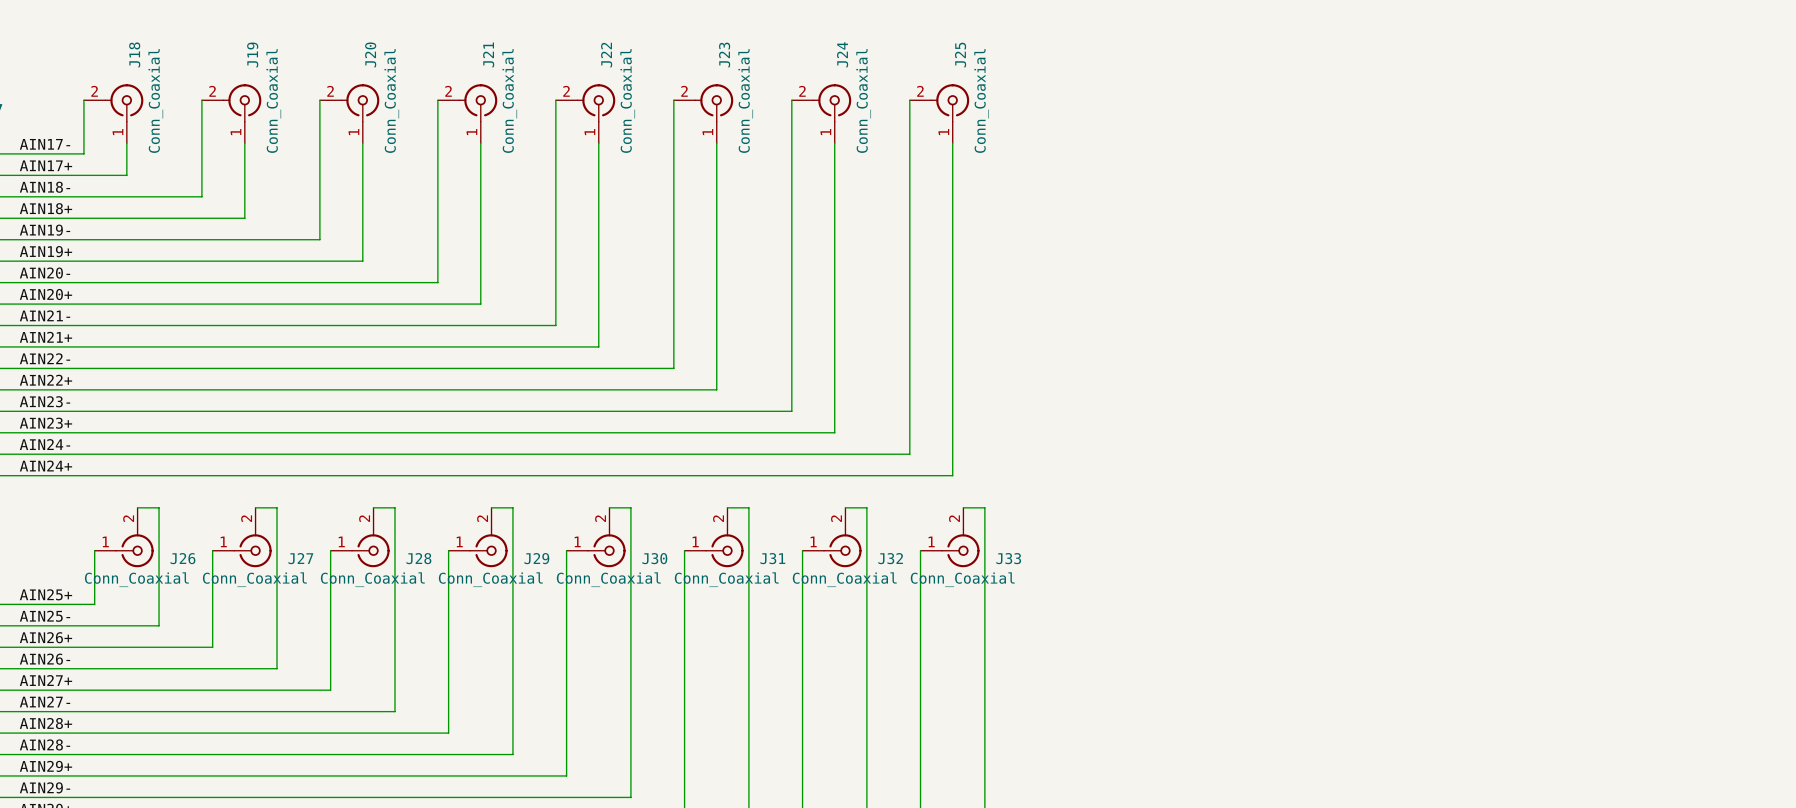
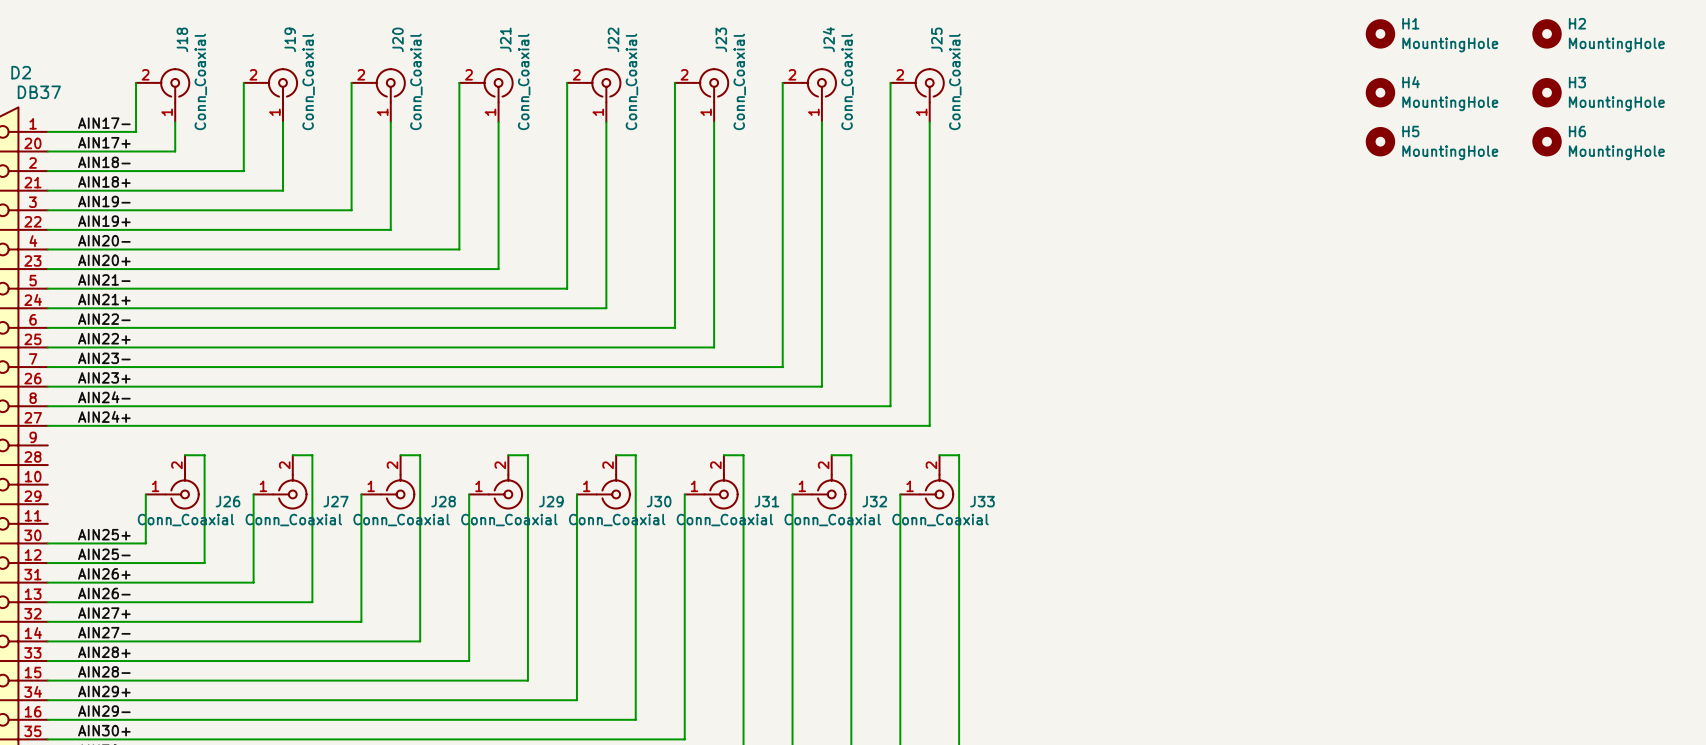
H1: none -> MountingHole (1380, 33)
H2: none -> MountingHole (1547, 33)
H4: none -> MountingHole (1380, 92)
H3: none -> MountingHole (1547, 92)
H5: none -> MountingHole (1380, 141)
H6: none -> MountingHole (1547, 141)

